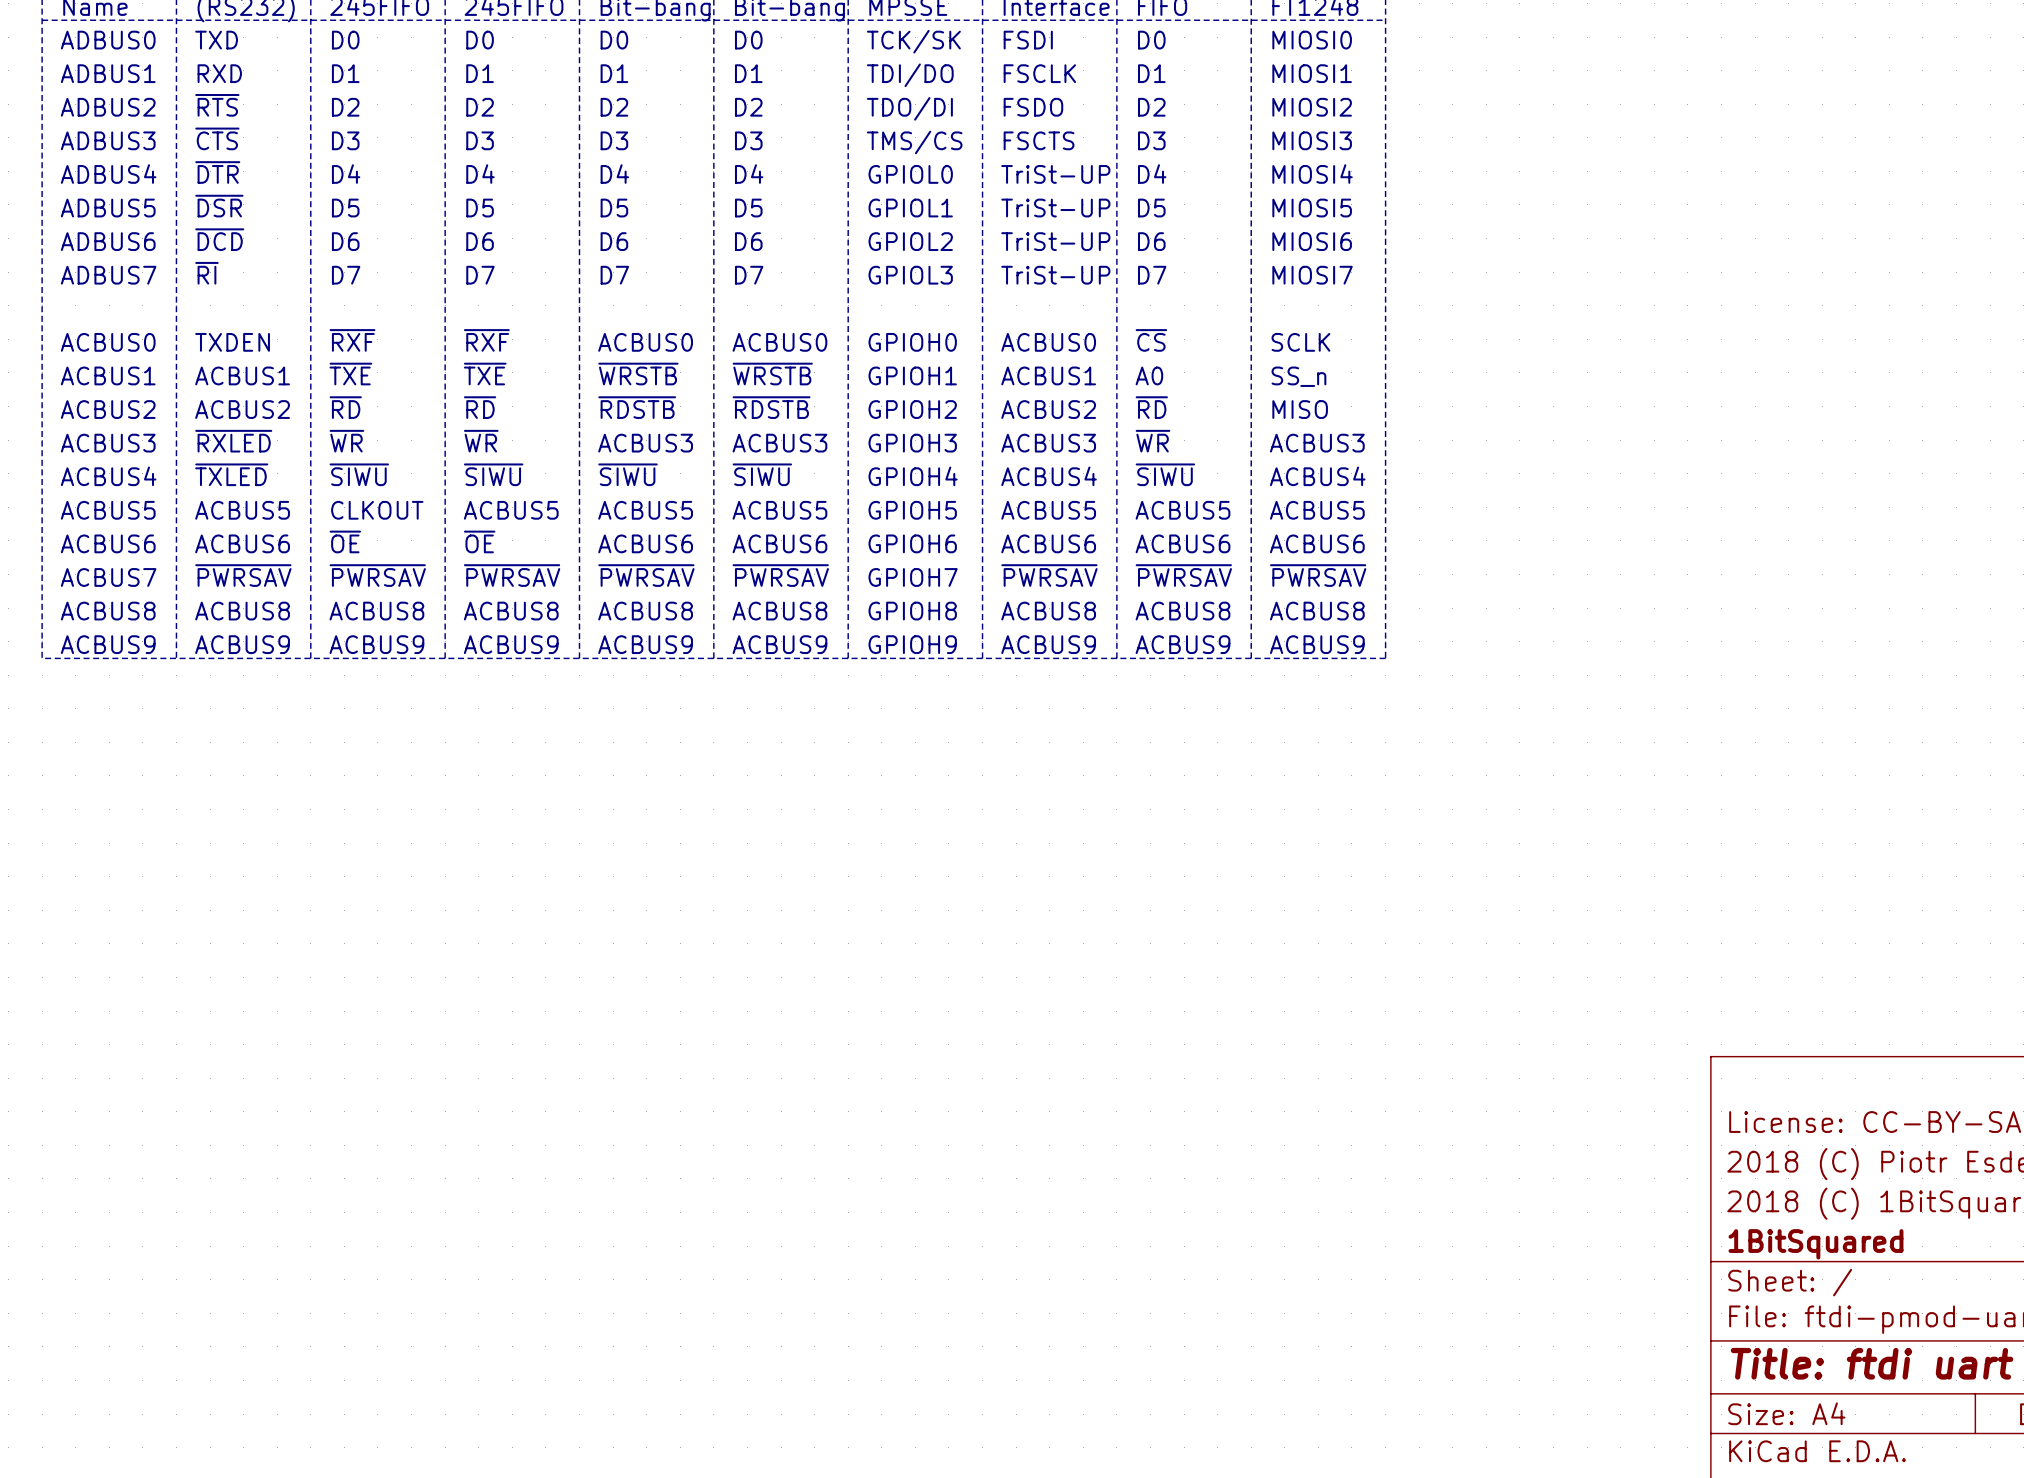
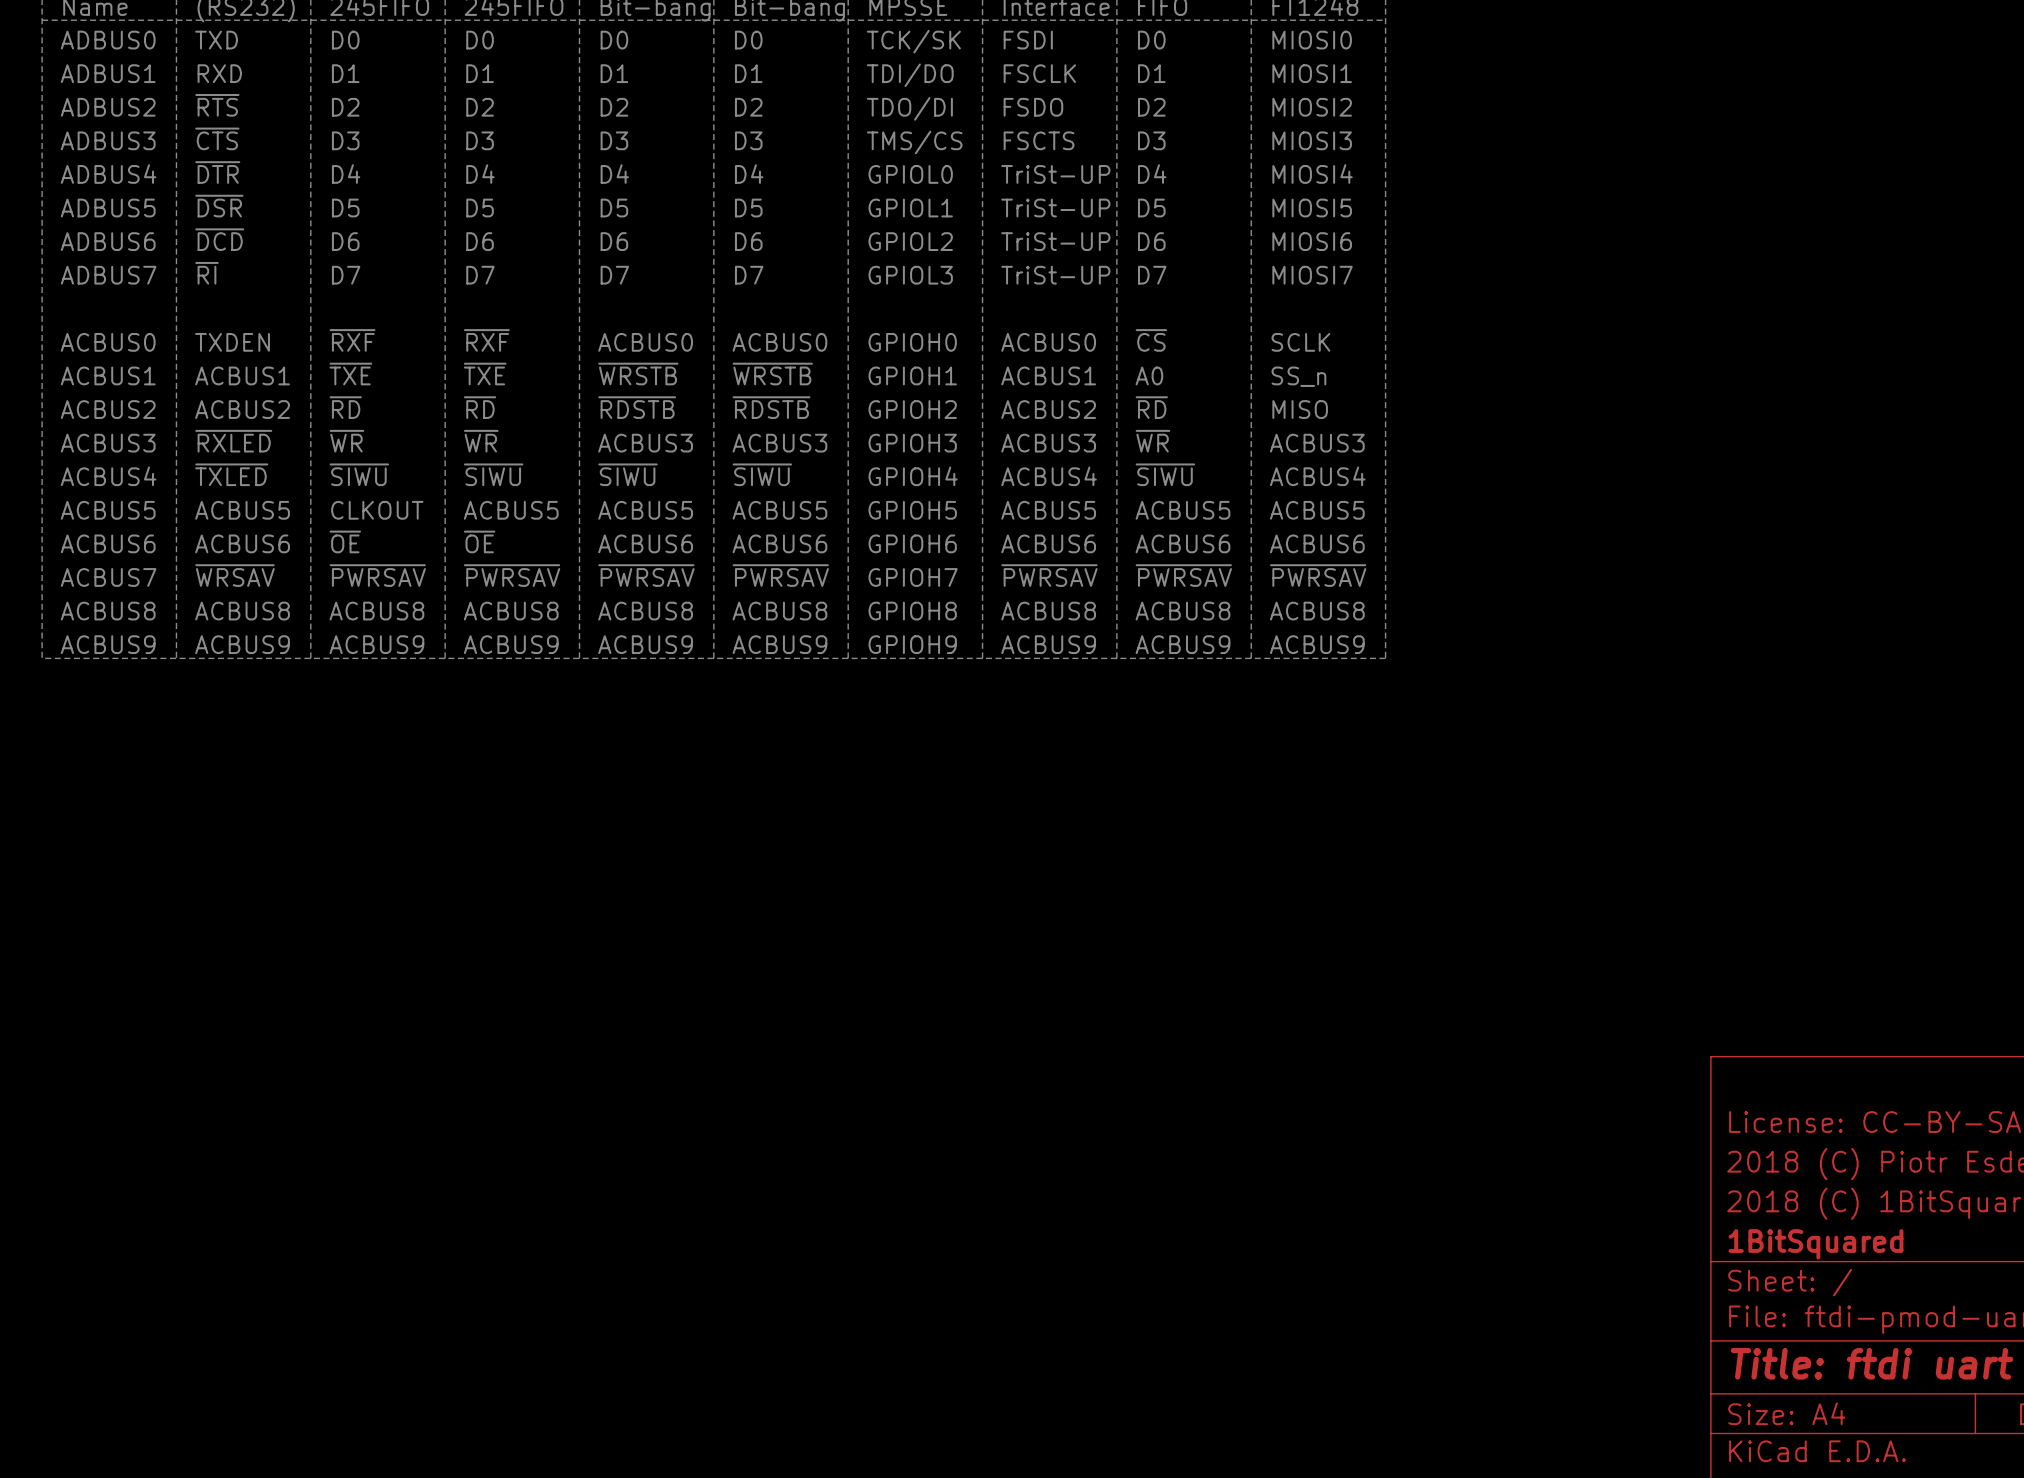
text: ~{PWRSAV} (243, 575) -> ~{WRSAV} (235, 575)

